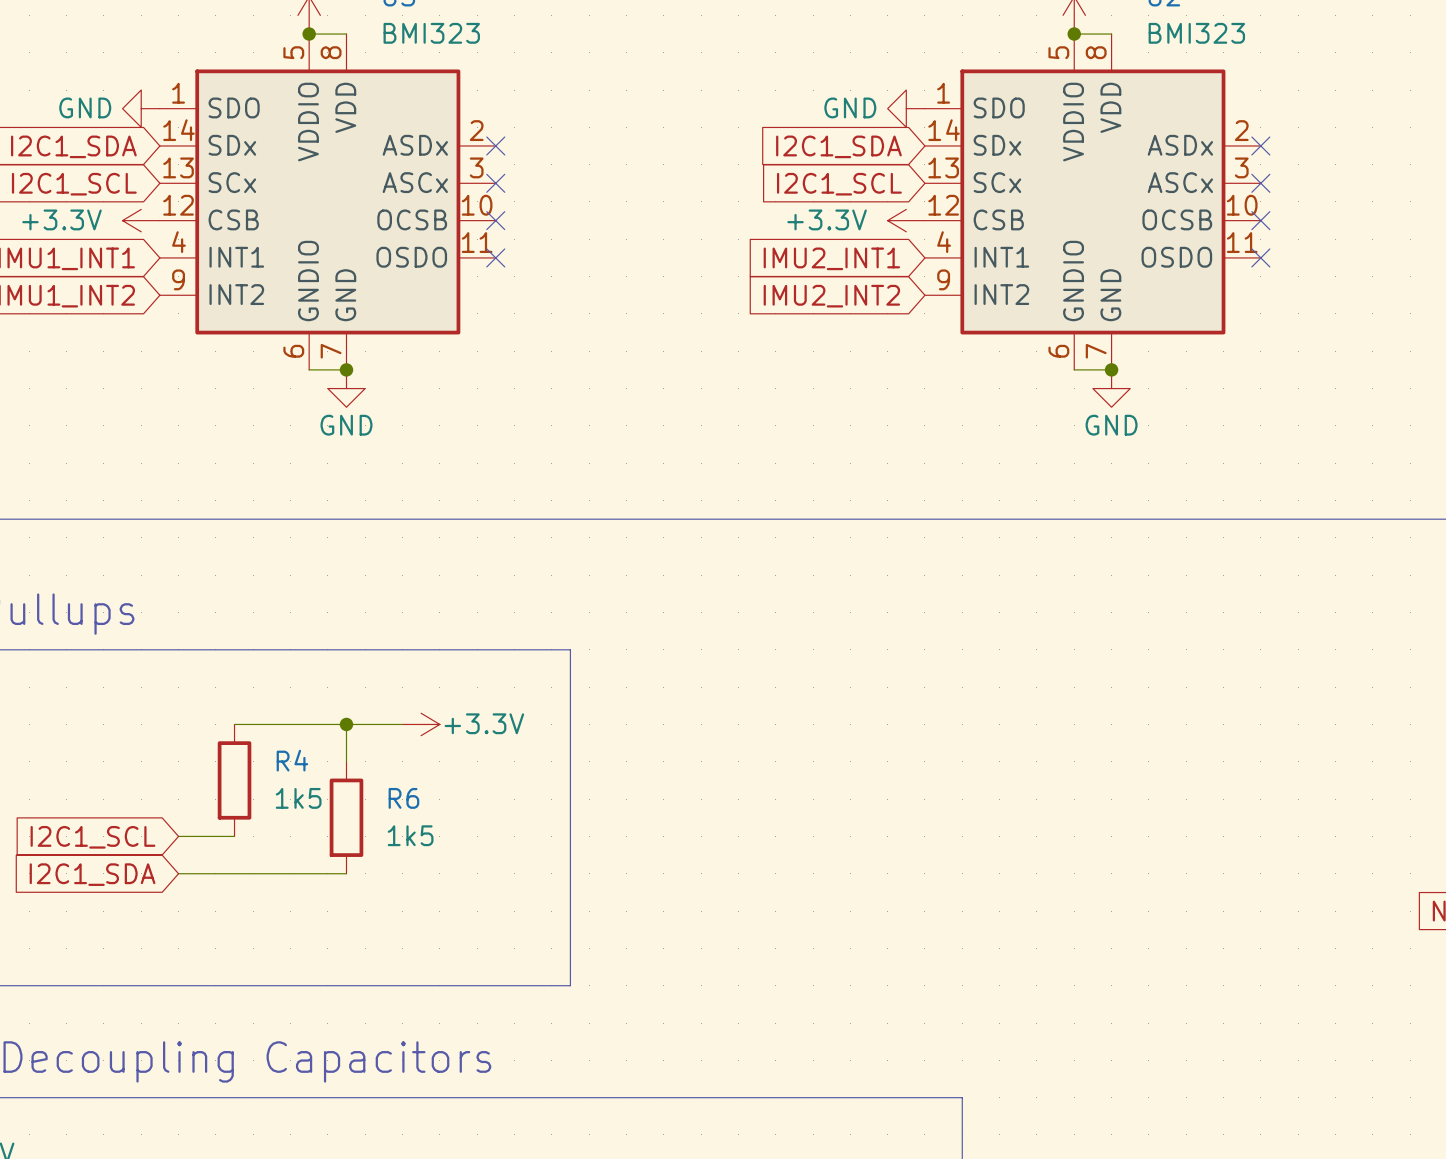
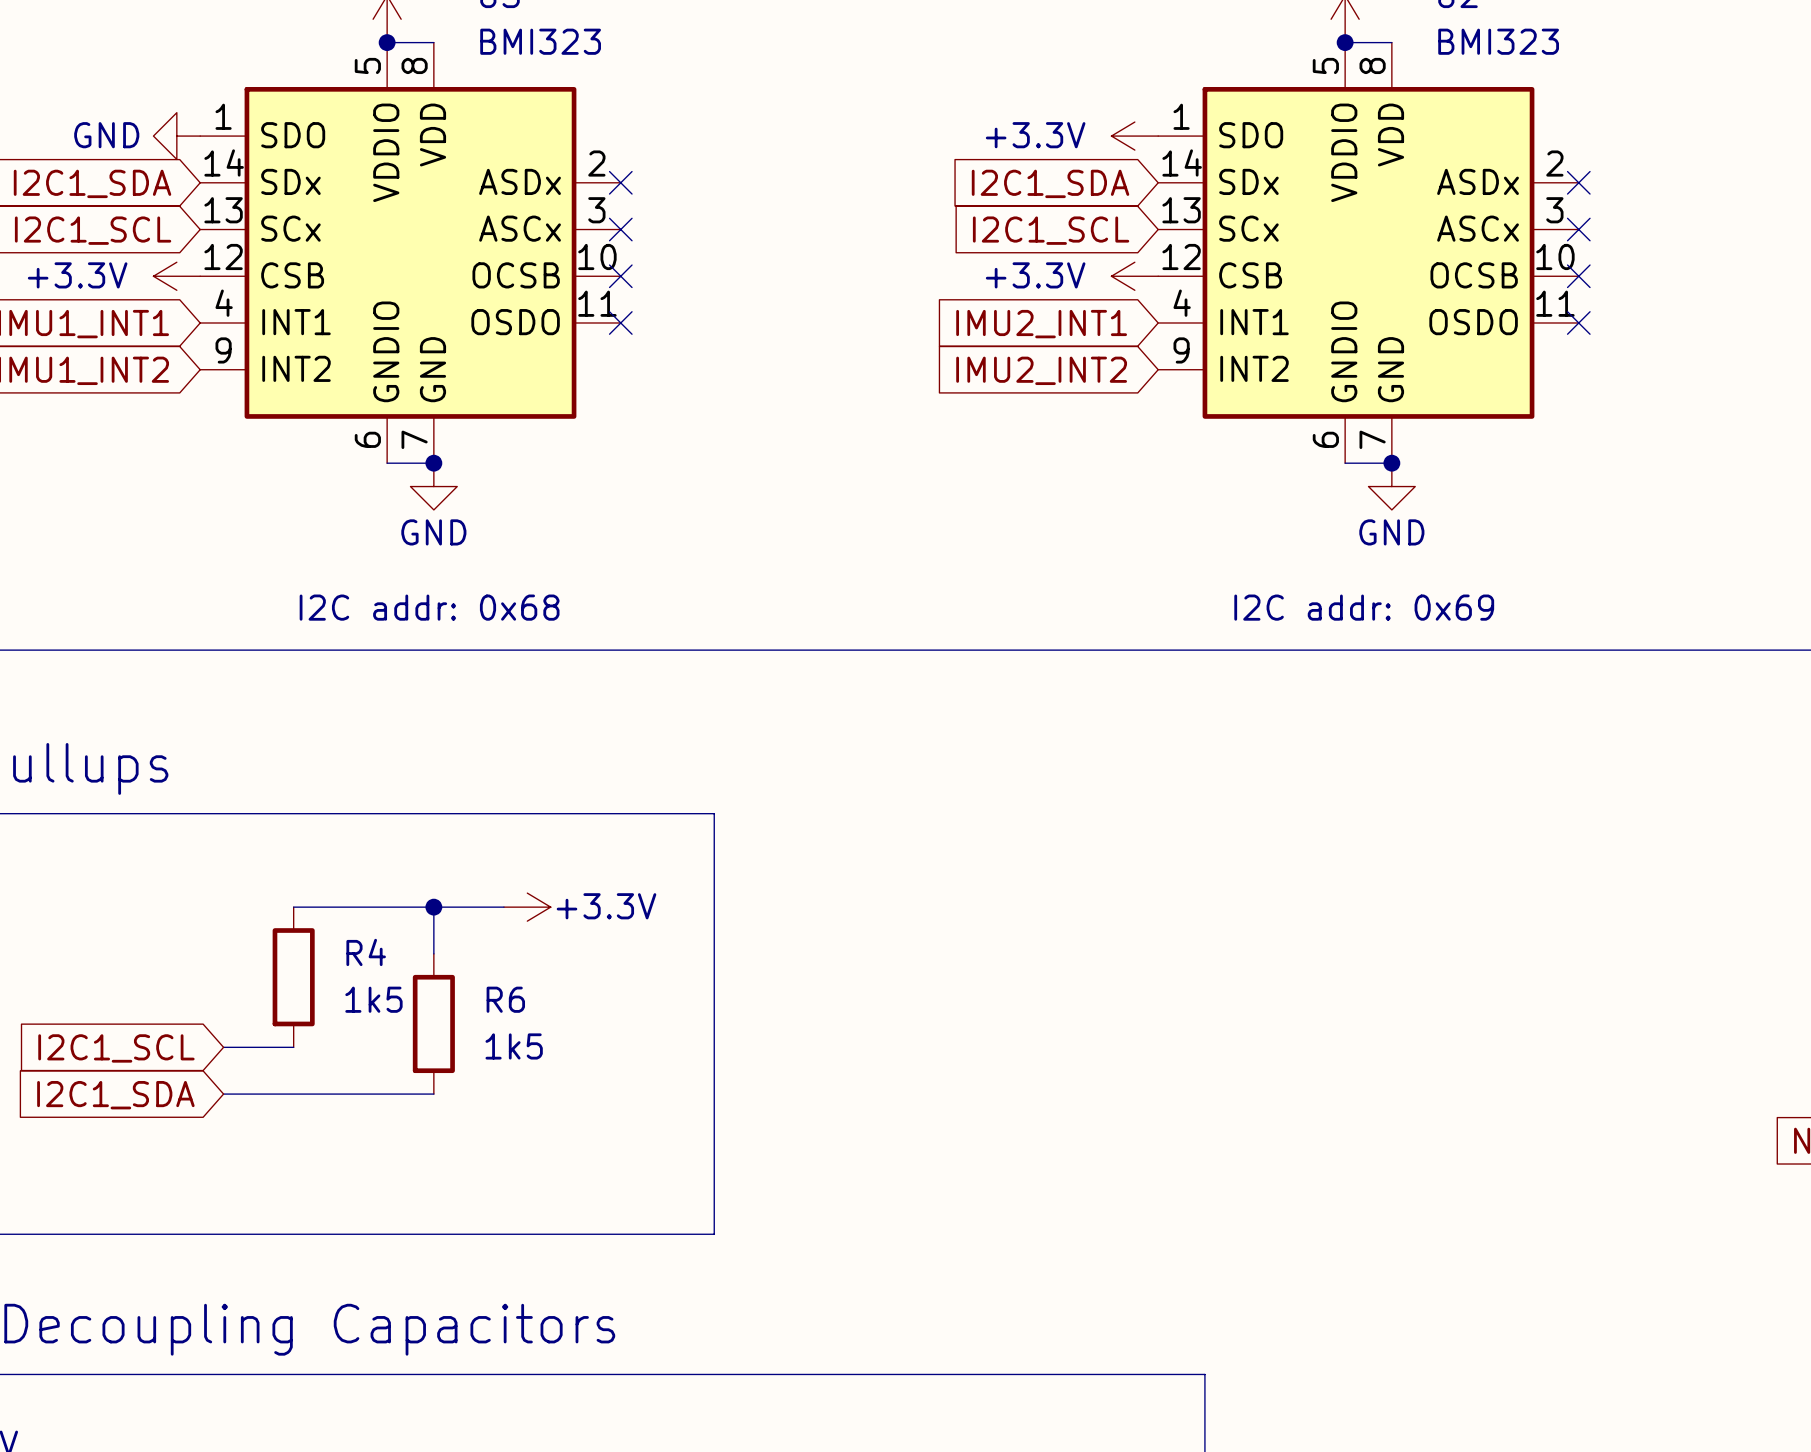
power symbol: GND (906, 108) -> +3.3V (1134, 136)
text: none -> I2C addr: 0x68 (429, 607)
text: none -> I2C addr: 0x69 (1364, 607)

